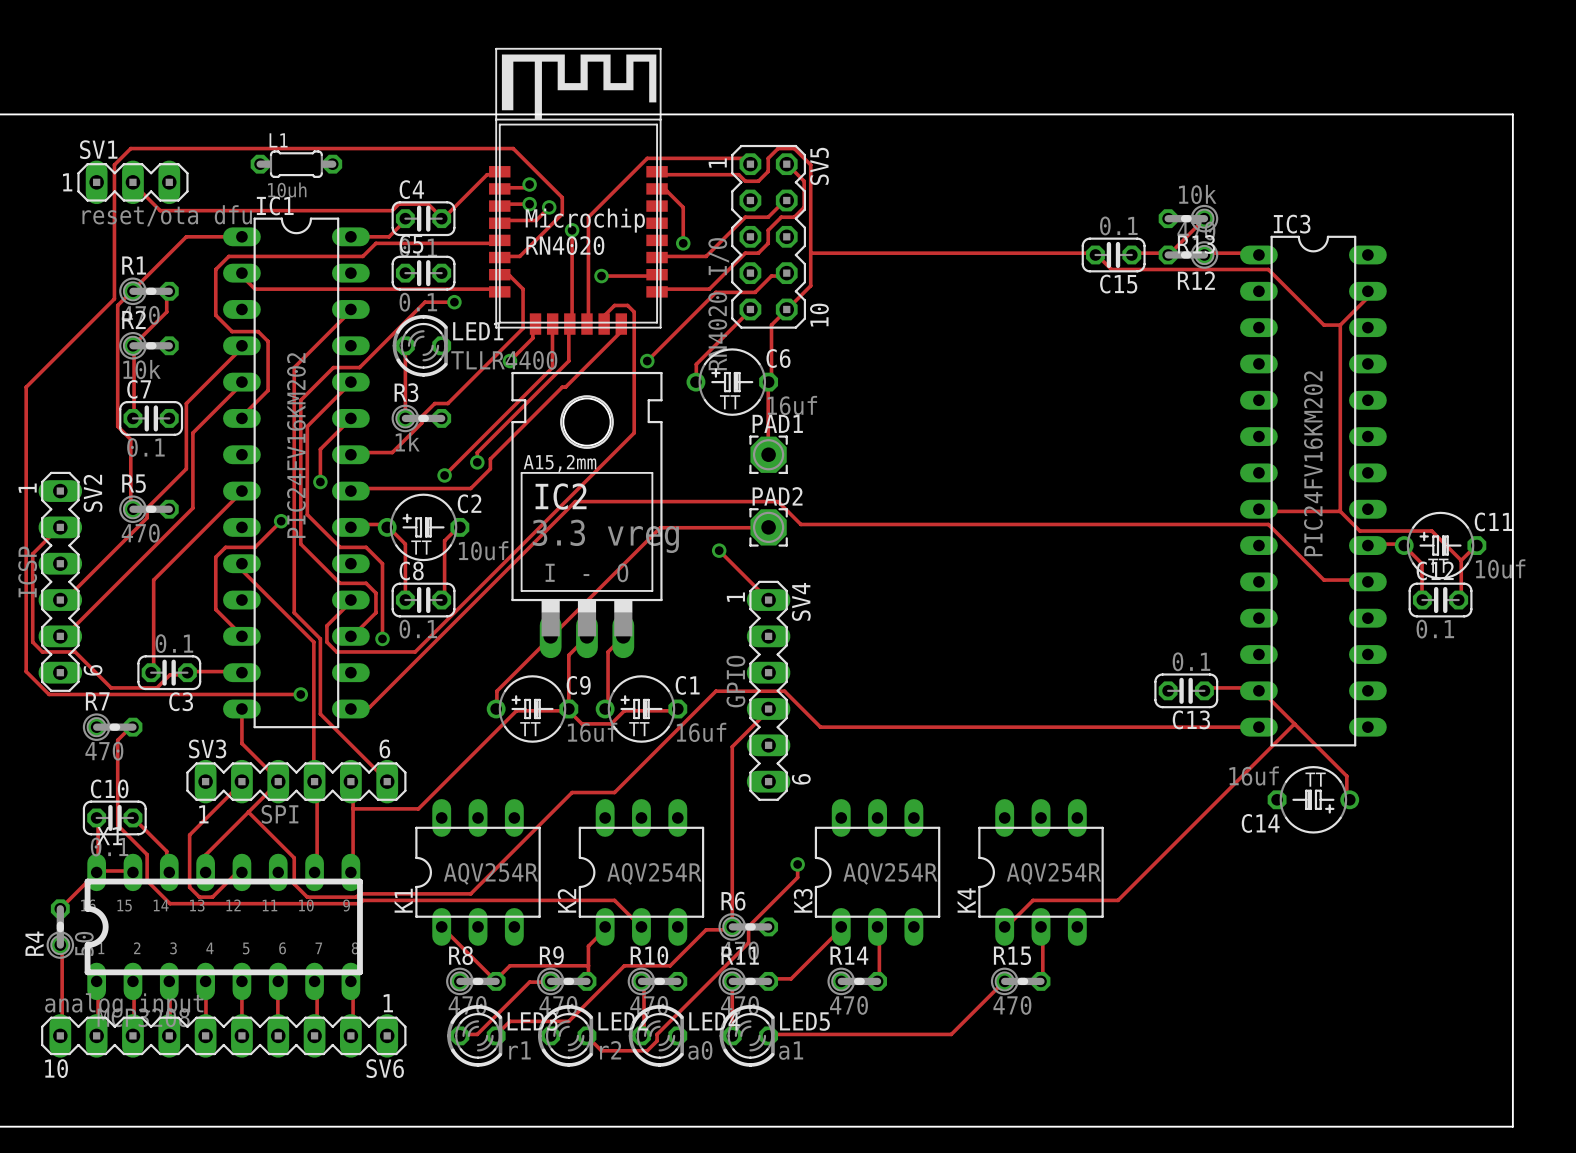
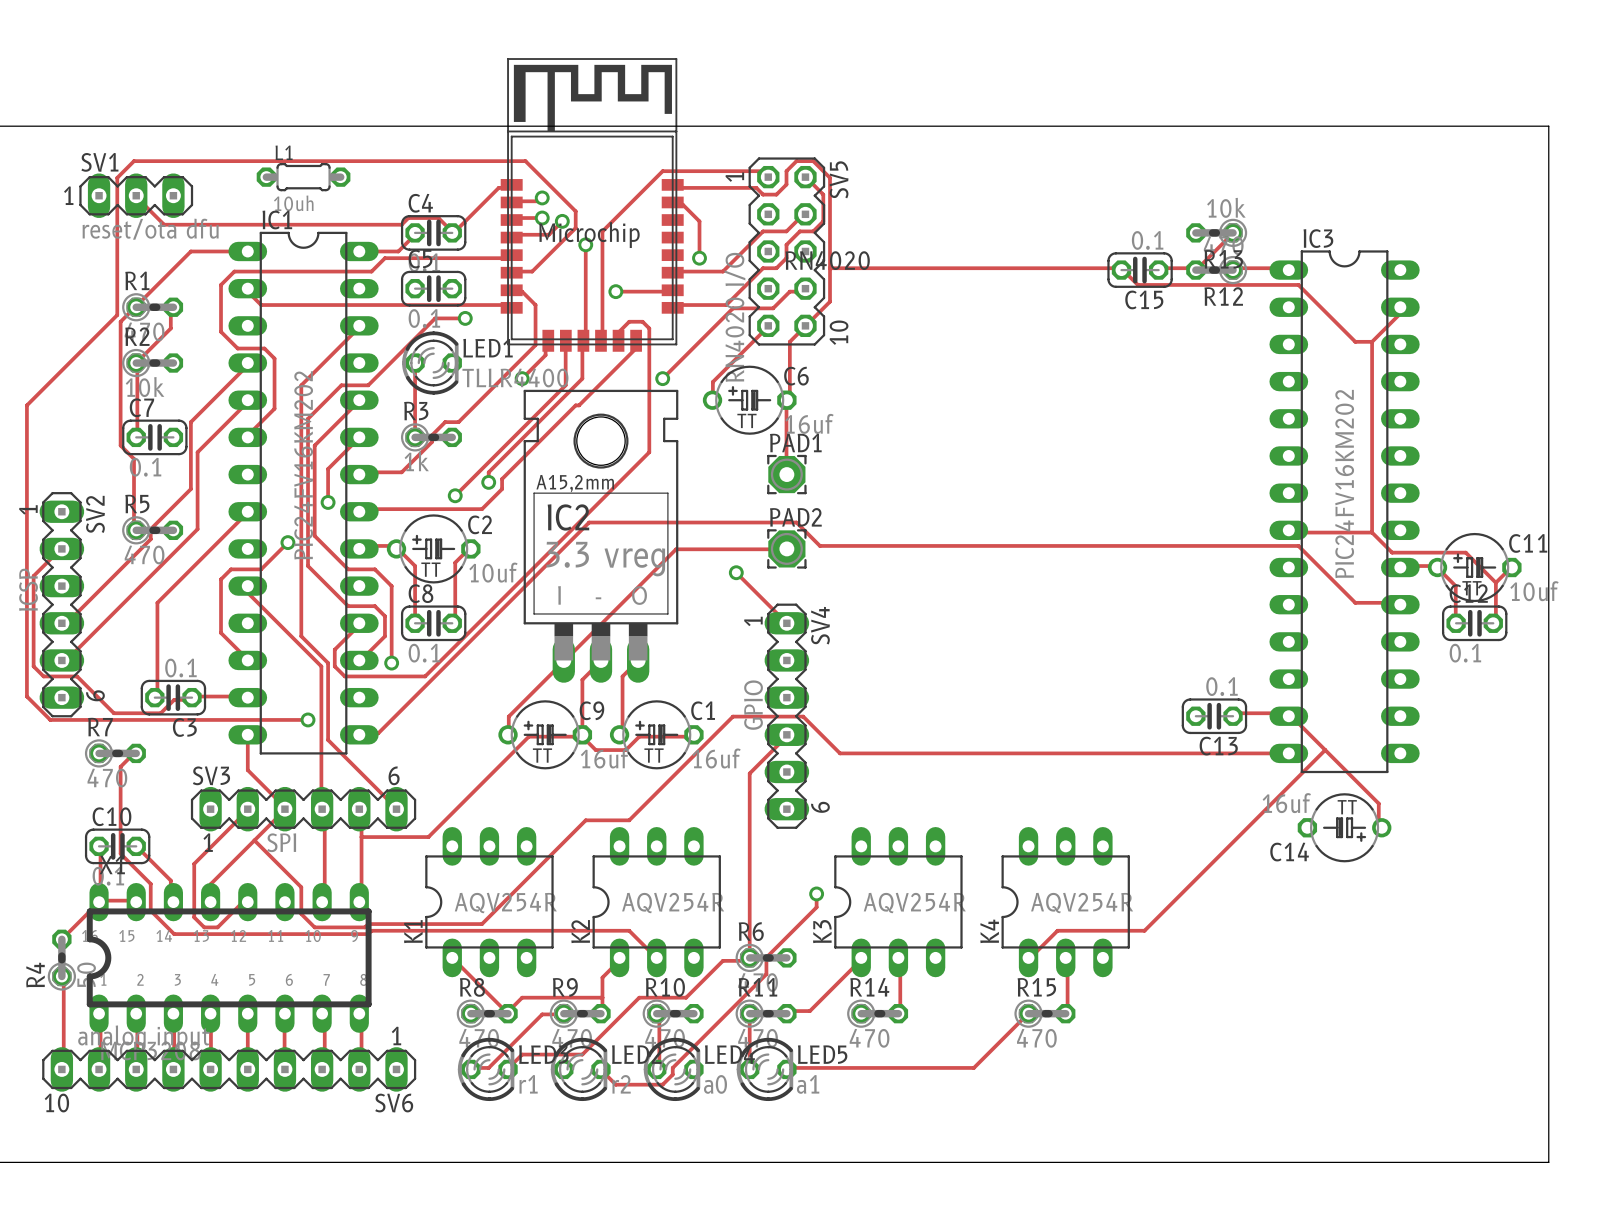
part footprint: [489, 47, 668, 335] -> [500, 58, 684, 352]

